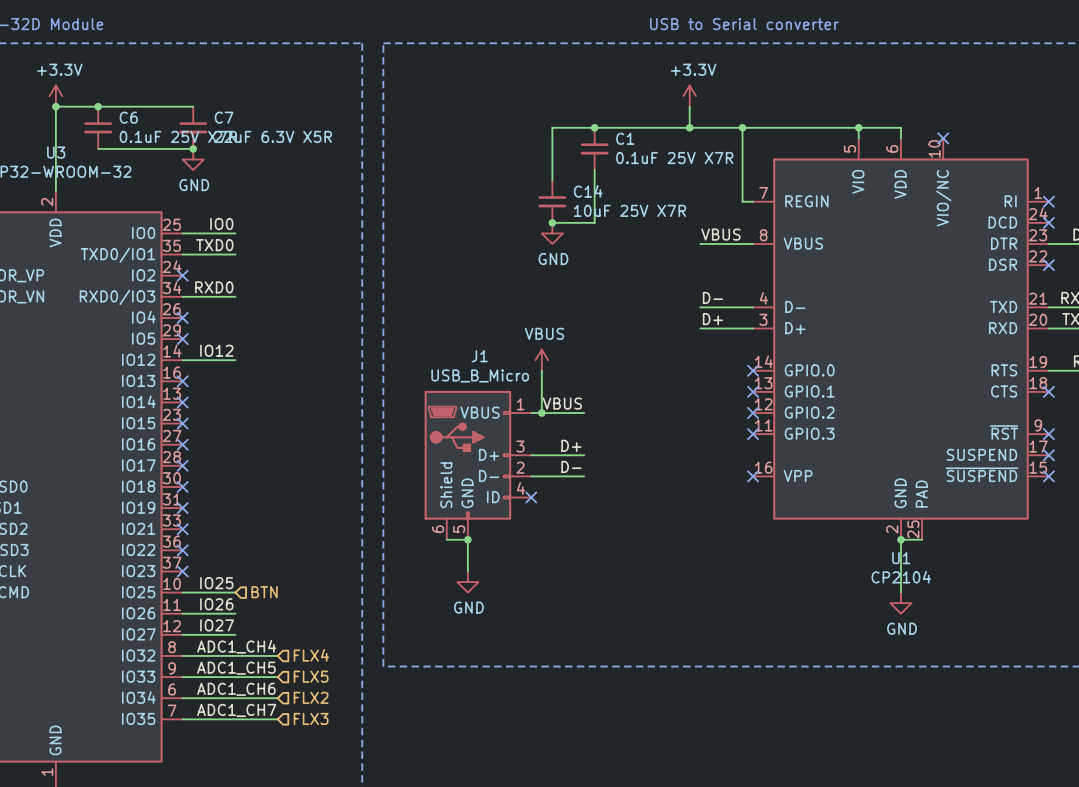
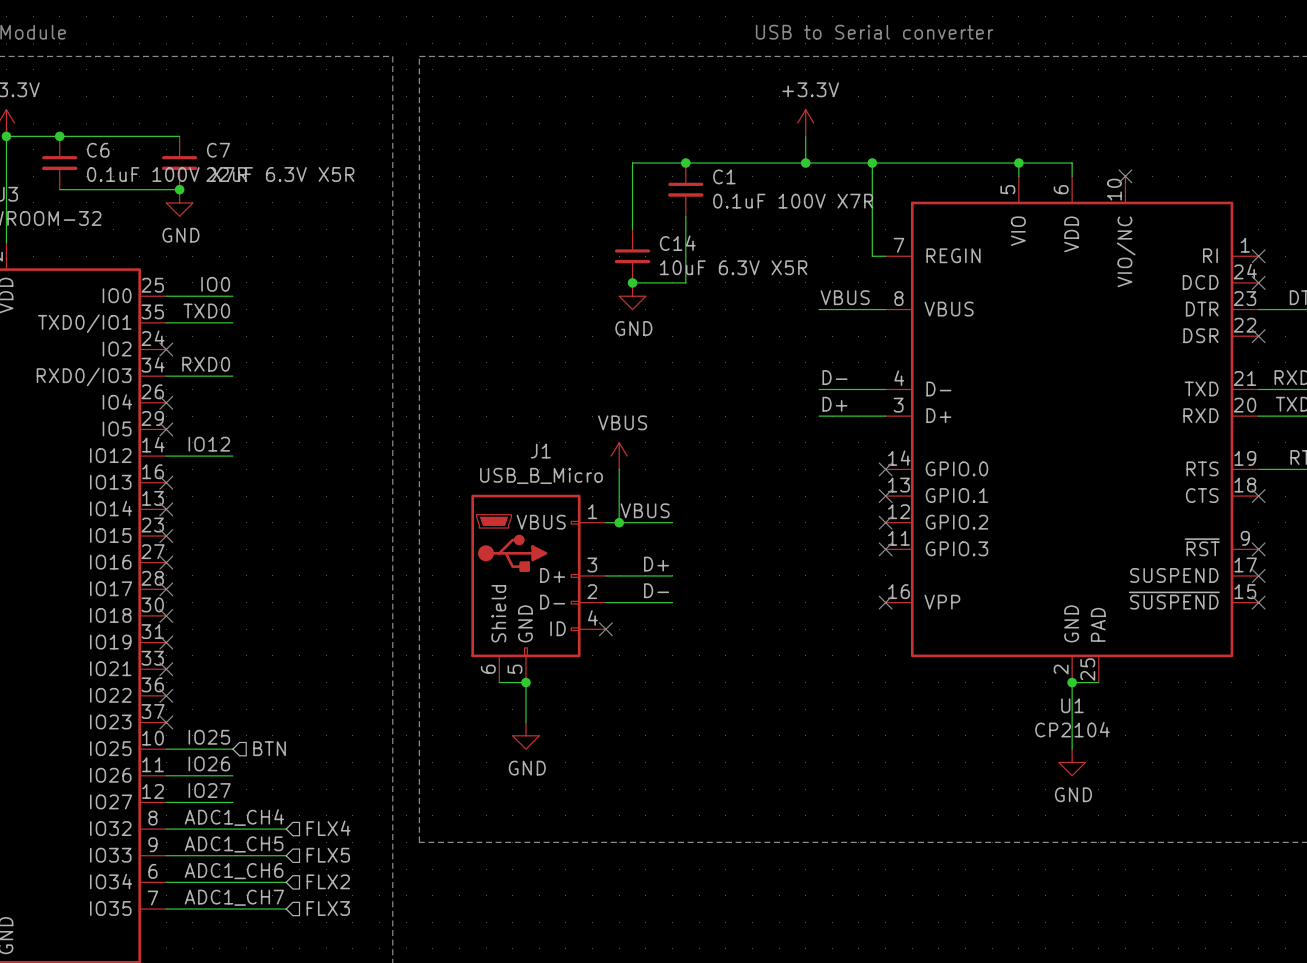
C6 value: 0.1uF 25V X7R (178, 136) -> 0.1uF 100V X7R (167, 174)
C1 value: 0.1uF 25V X7R (674, 158) -> 0.1uF 100V X7R (793, 201)
C14 value: 10uF 25V X7R (630, 210) -> 10uF 6.3V X5R (733, 267)

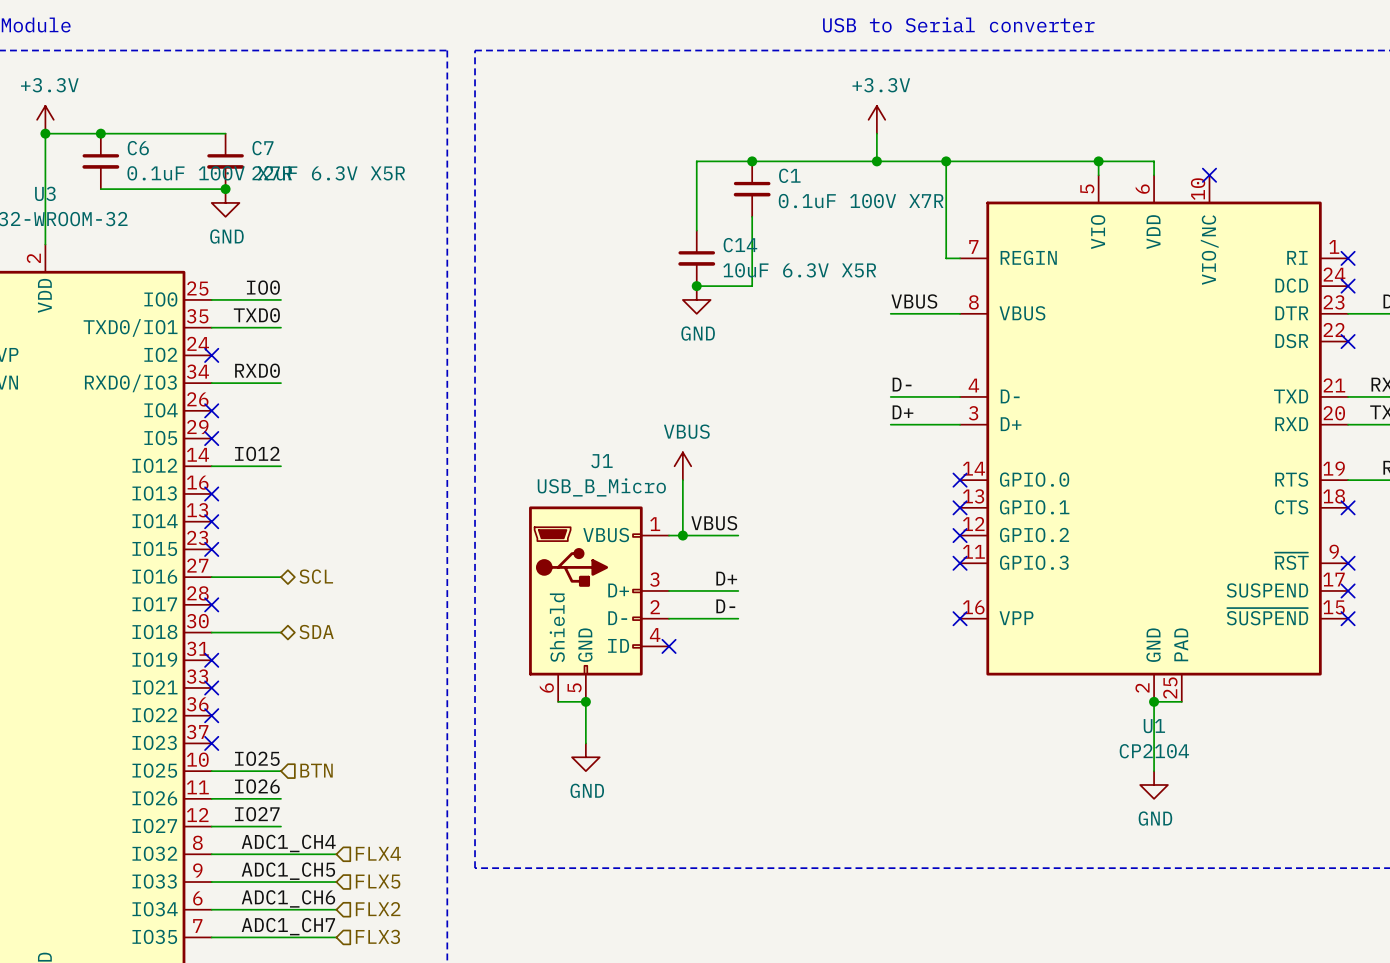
wire: none -> (211, 577) (280, 577)
no-connect mark: (166, 562) -> none
hierarchical label: none -> SCL (316, 576)
wire: none -> (211, 632) (280, 632)
no-connect mark: (166, 615) -> none
hierarchical label: none -> SDA (316, 632)

